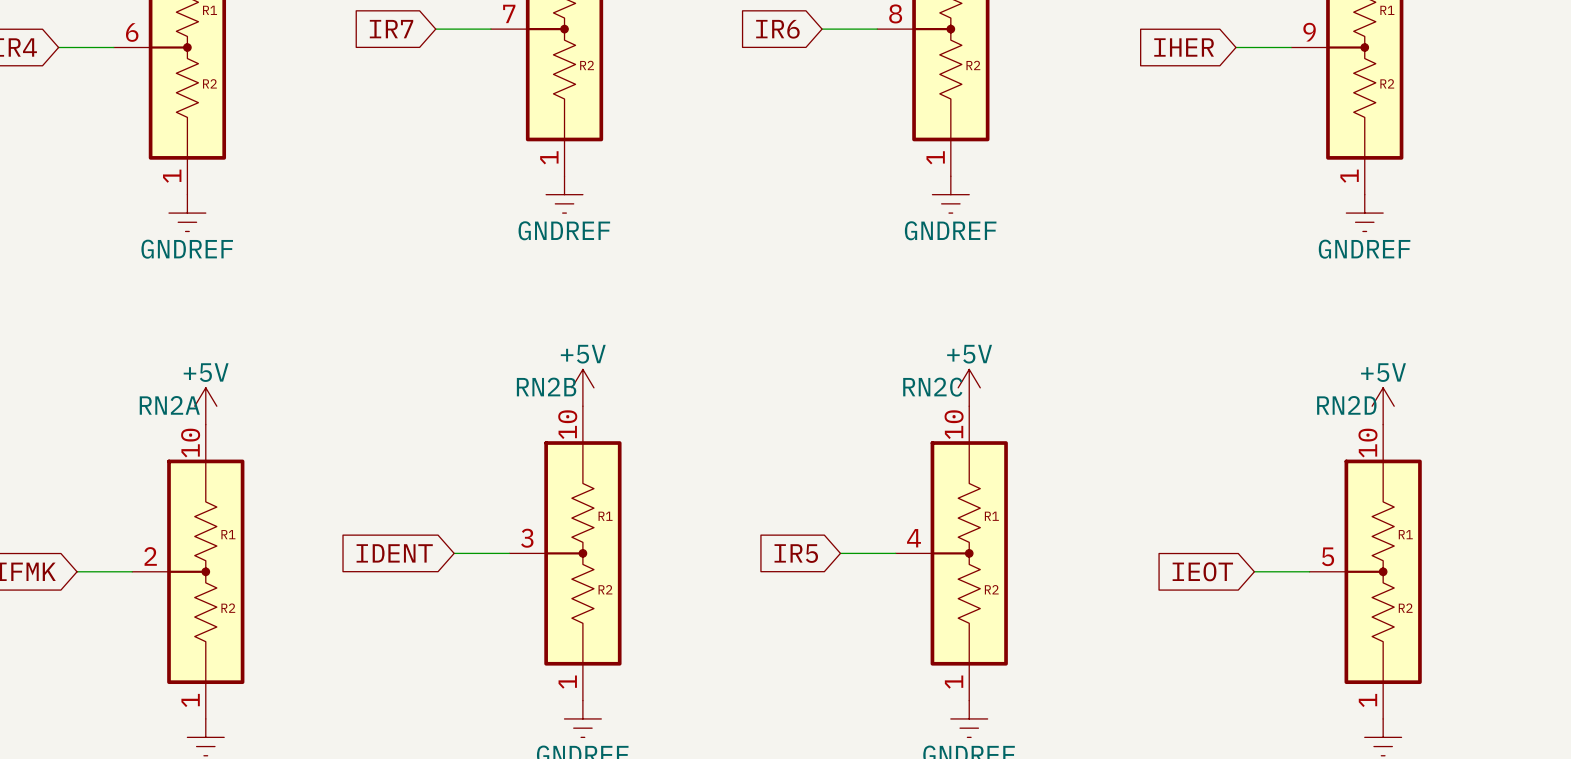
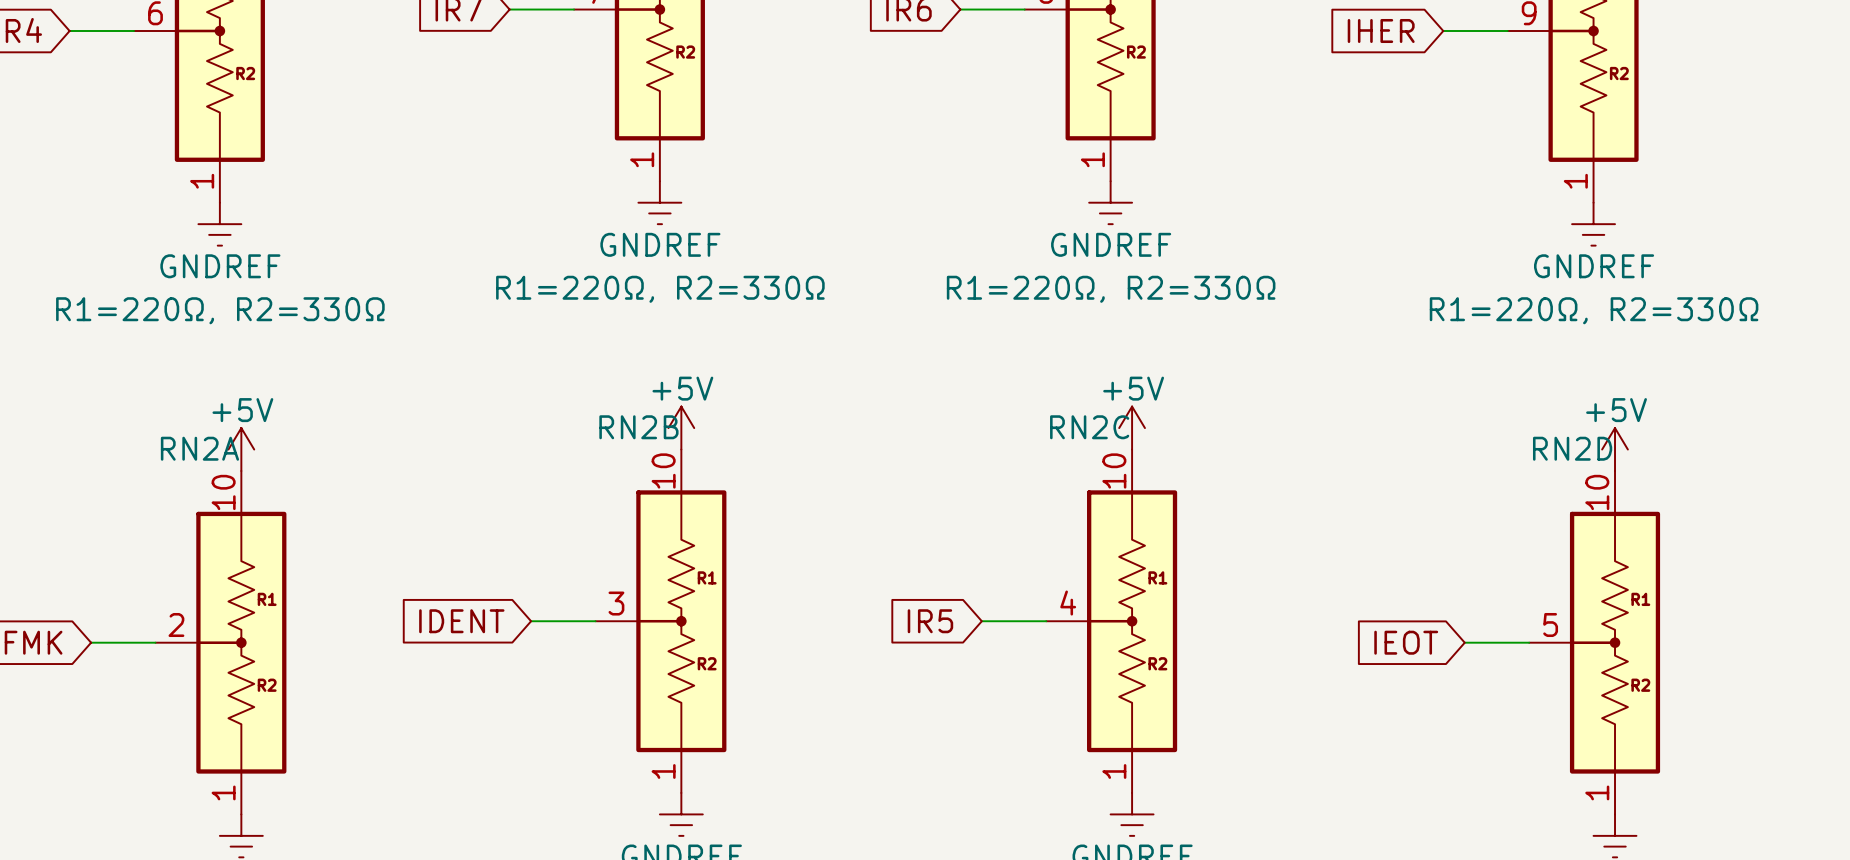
part value: none -> R1=220Ω, R2=330Ω (660, 289)
part value: none -> R1=220Ω, R2=330Ω (1111, 289)
part value: none -> R1=220Ω, R2=330Ω (220, 310)
part value: none -> R1=220Ω, R2=330Ω (1594, 310)

